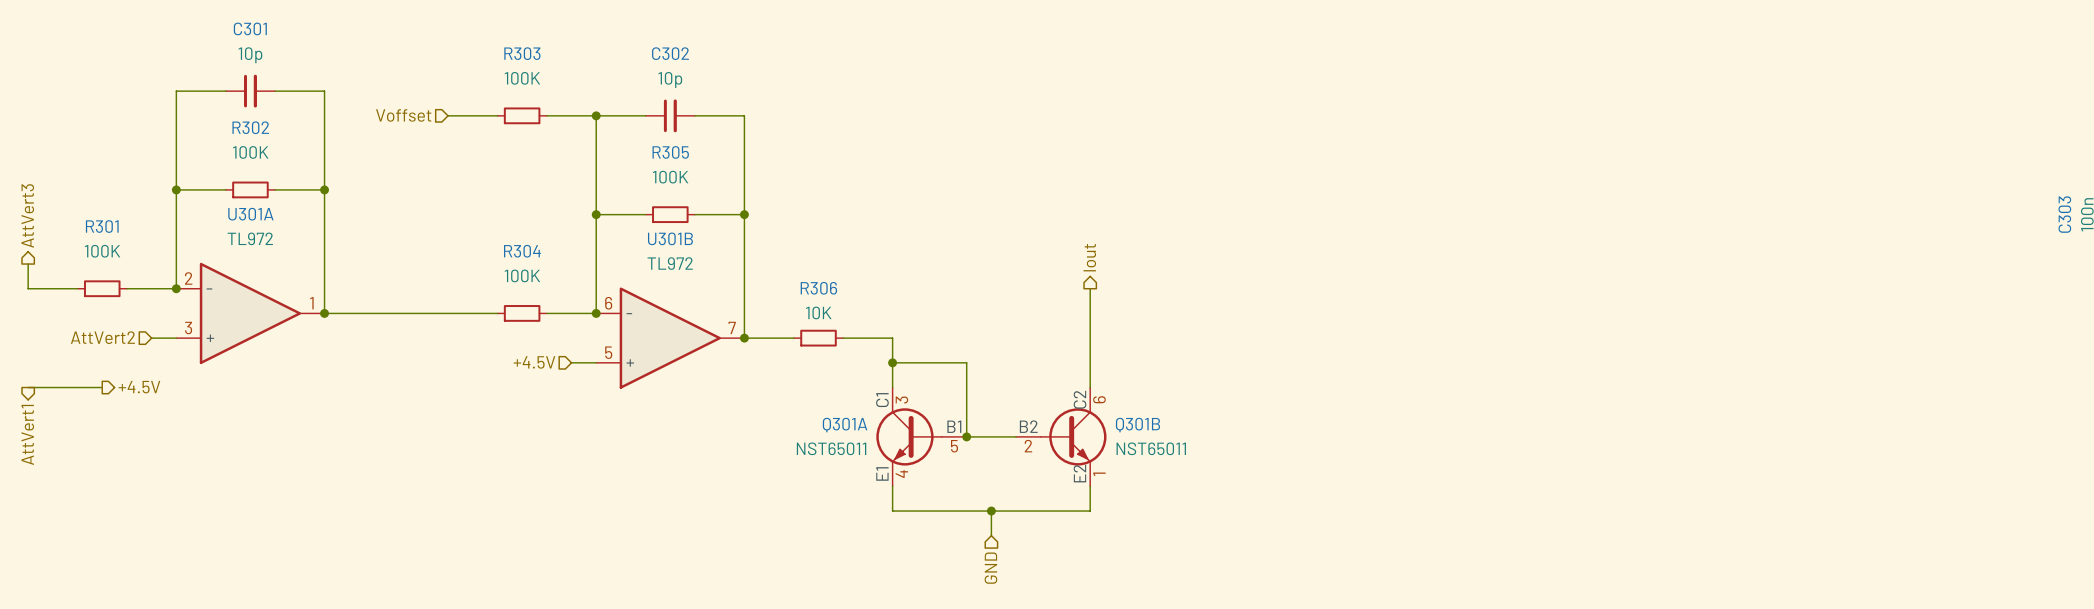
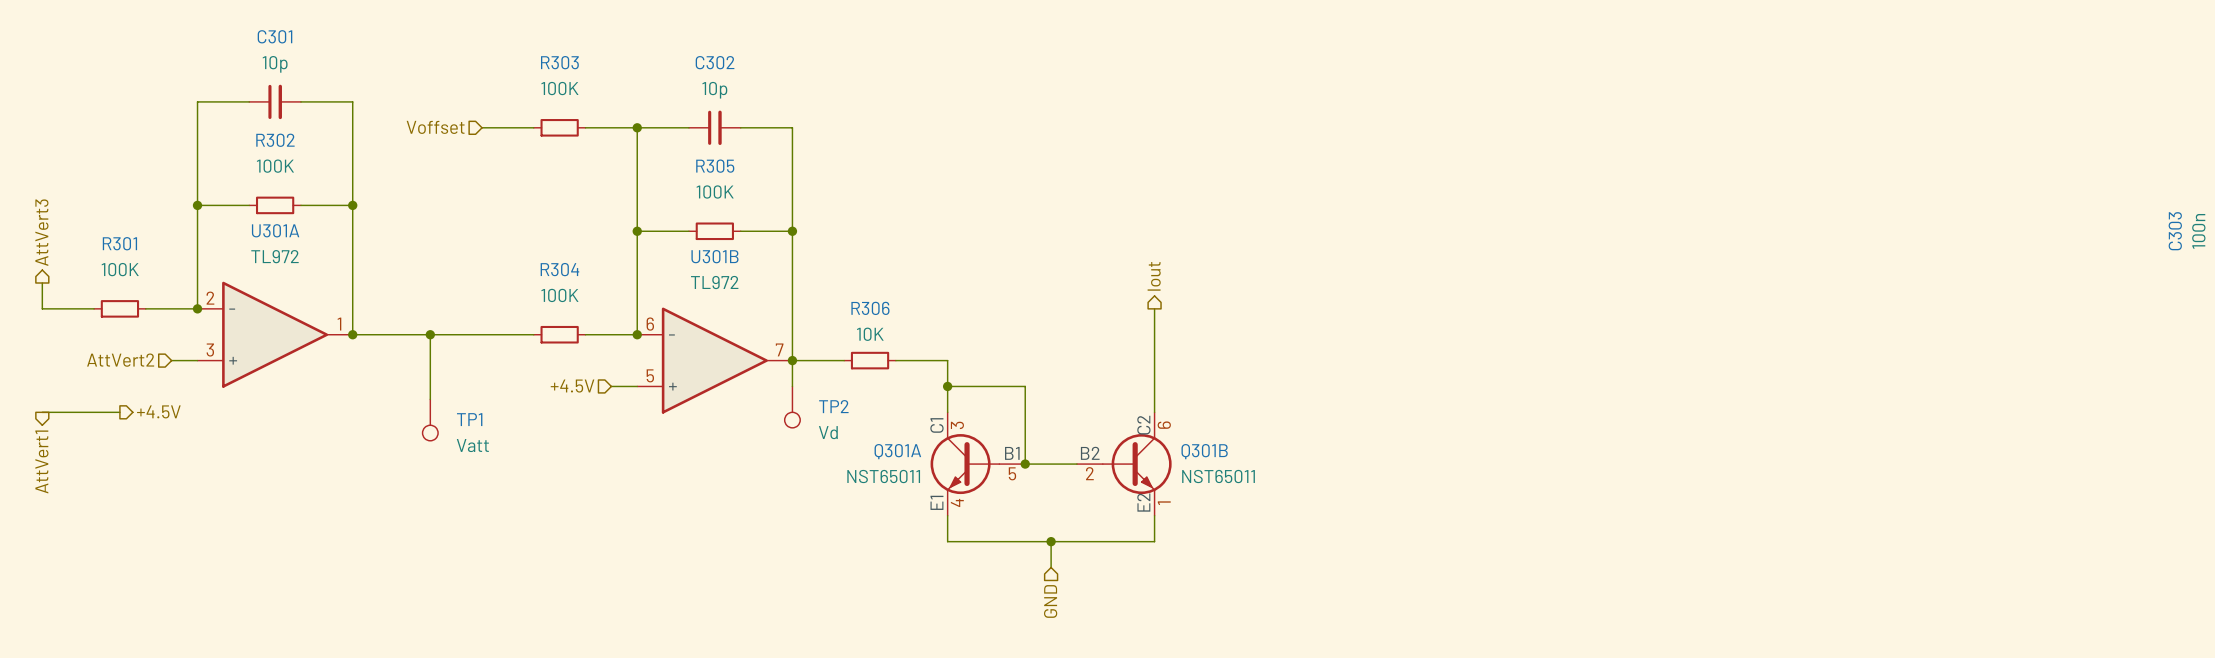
wire: none -> (430, 334) (430, 399)
junction: none -> (430, 334)
wire: none -> (792, 360) (792, 386)
TP2: none -> Vd (792, 407)
TP1: none -> Vatt (430, 420)

